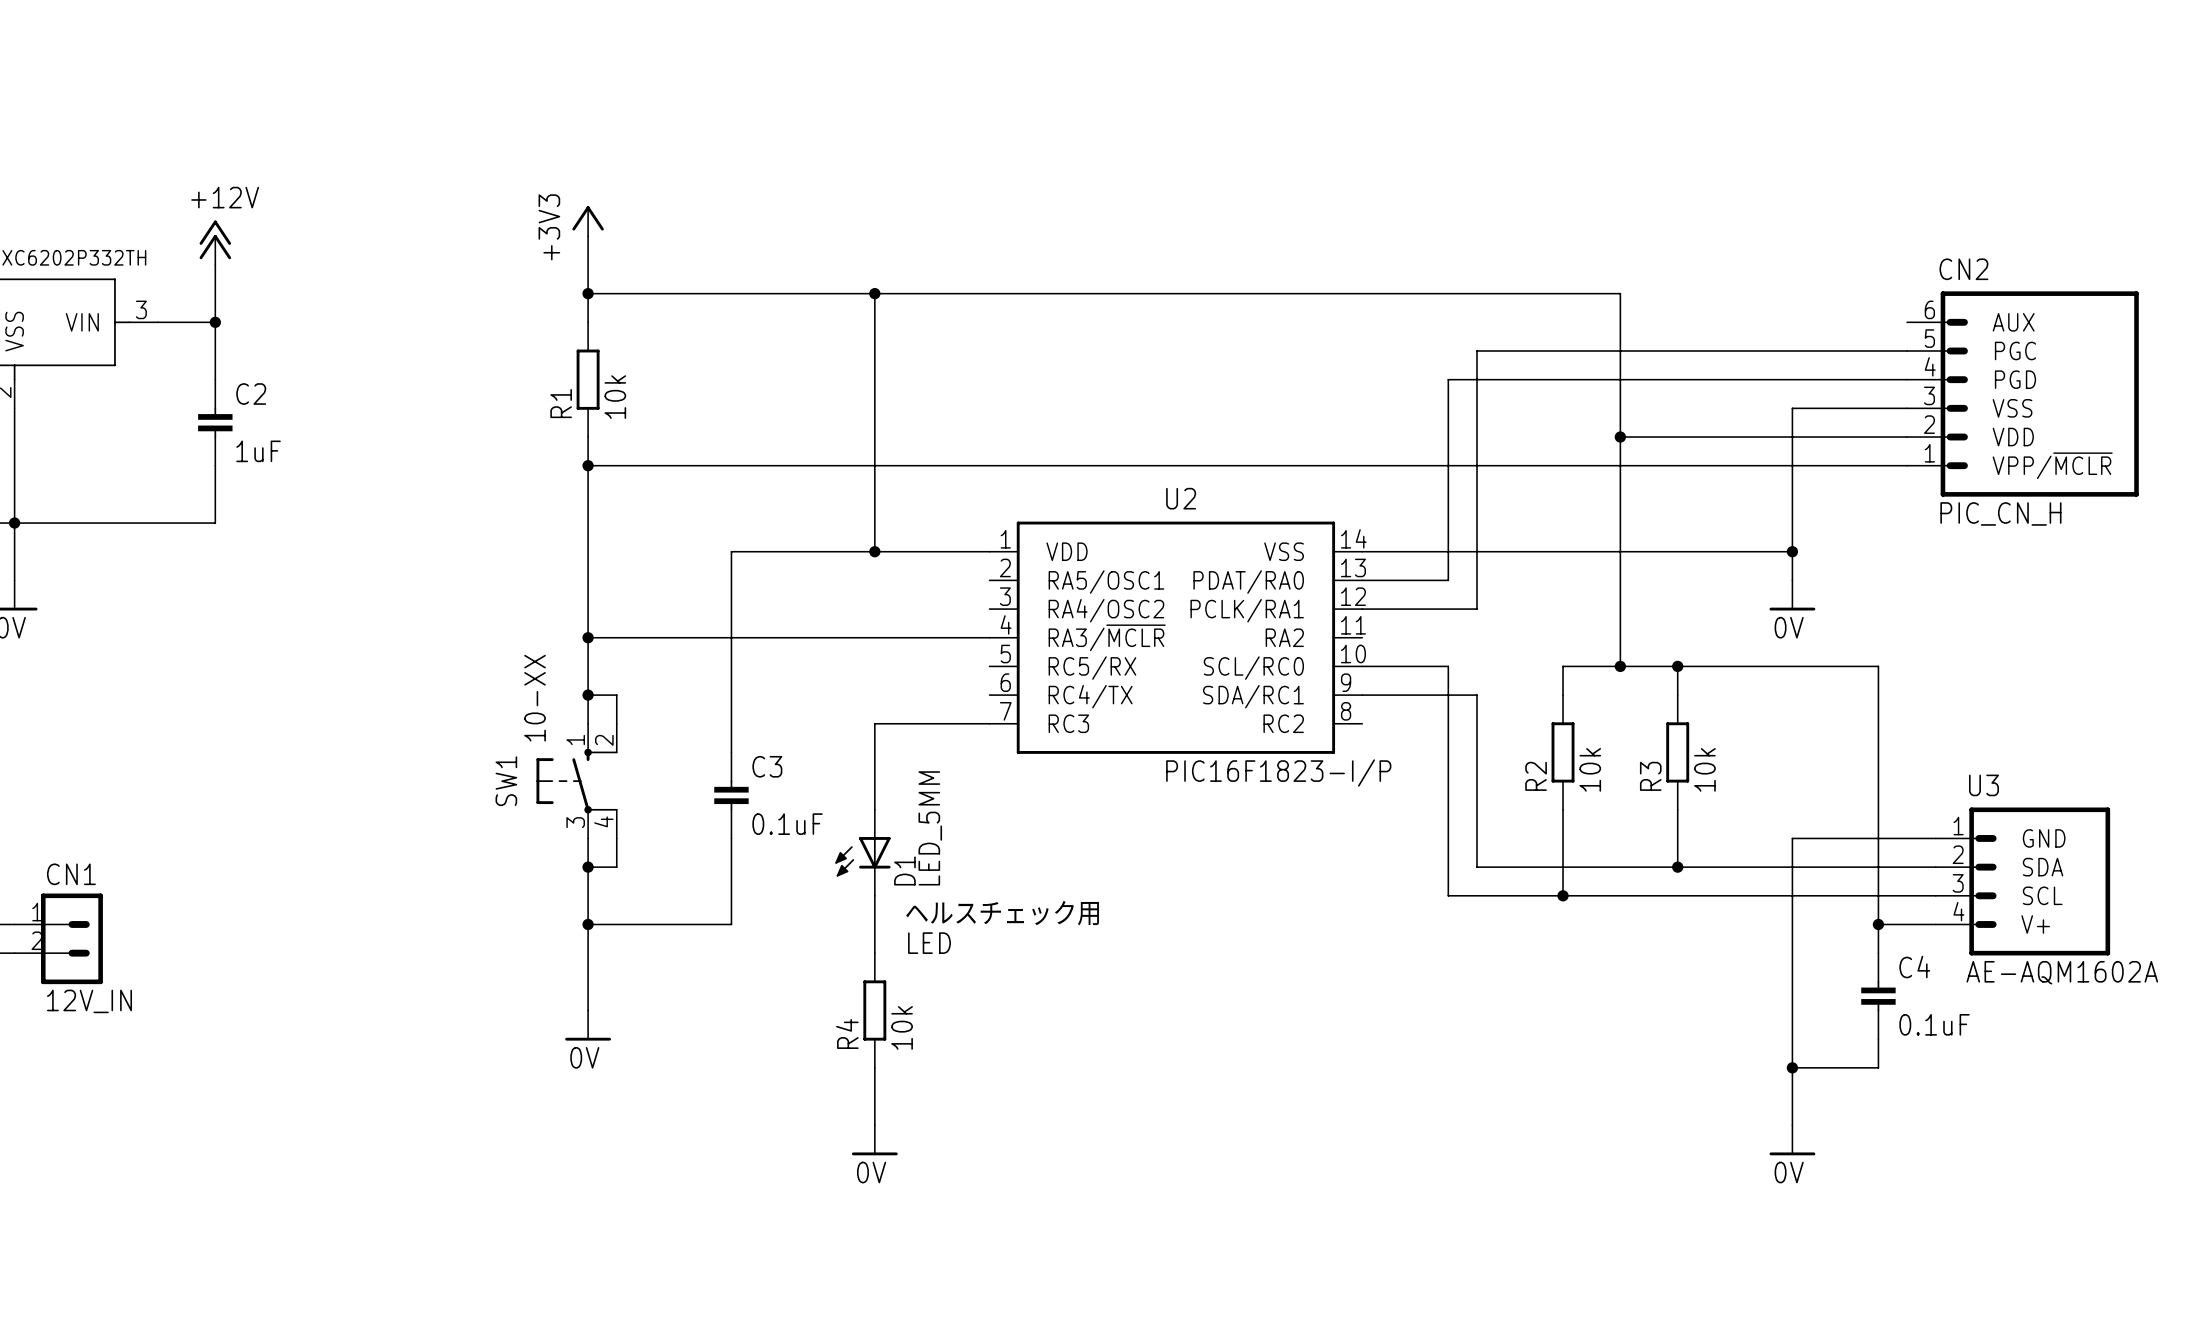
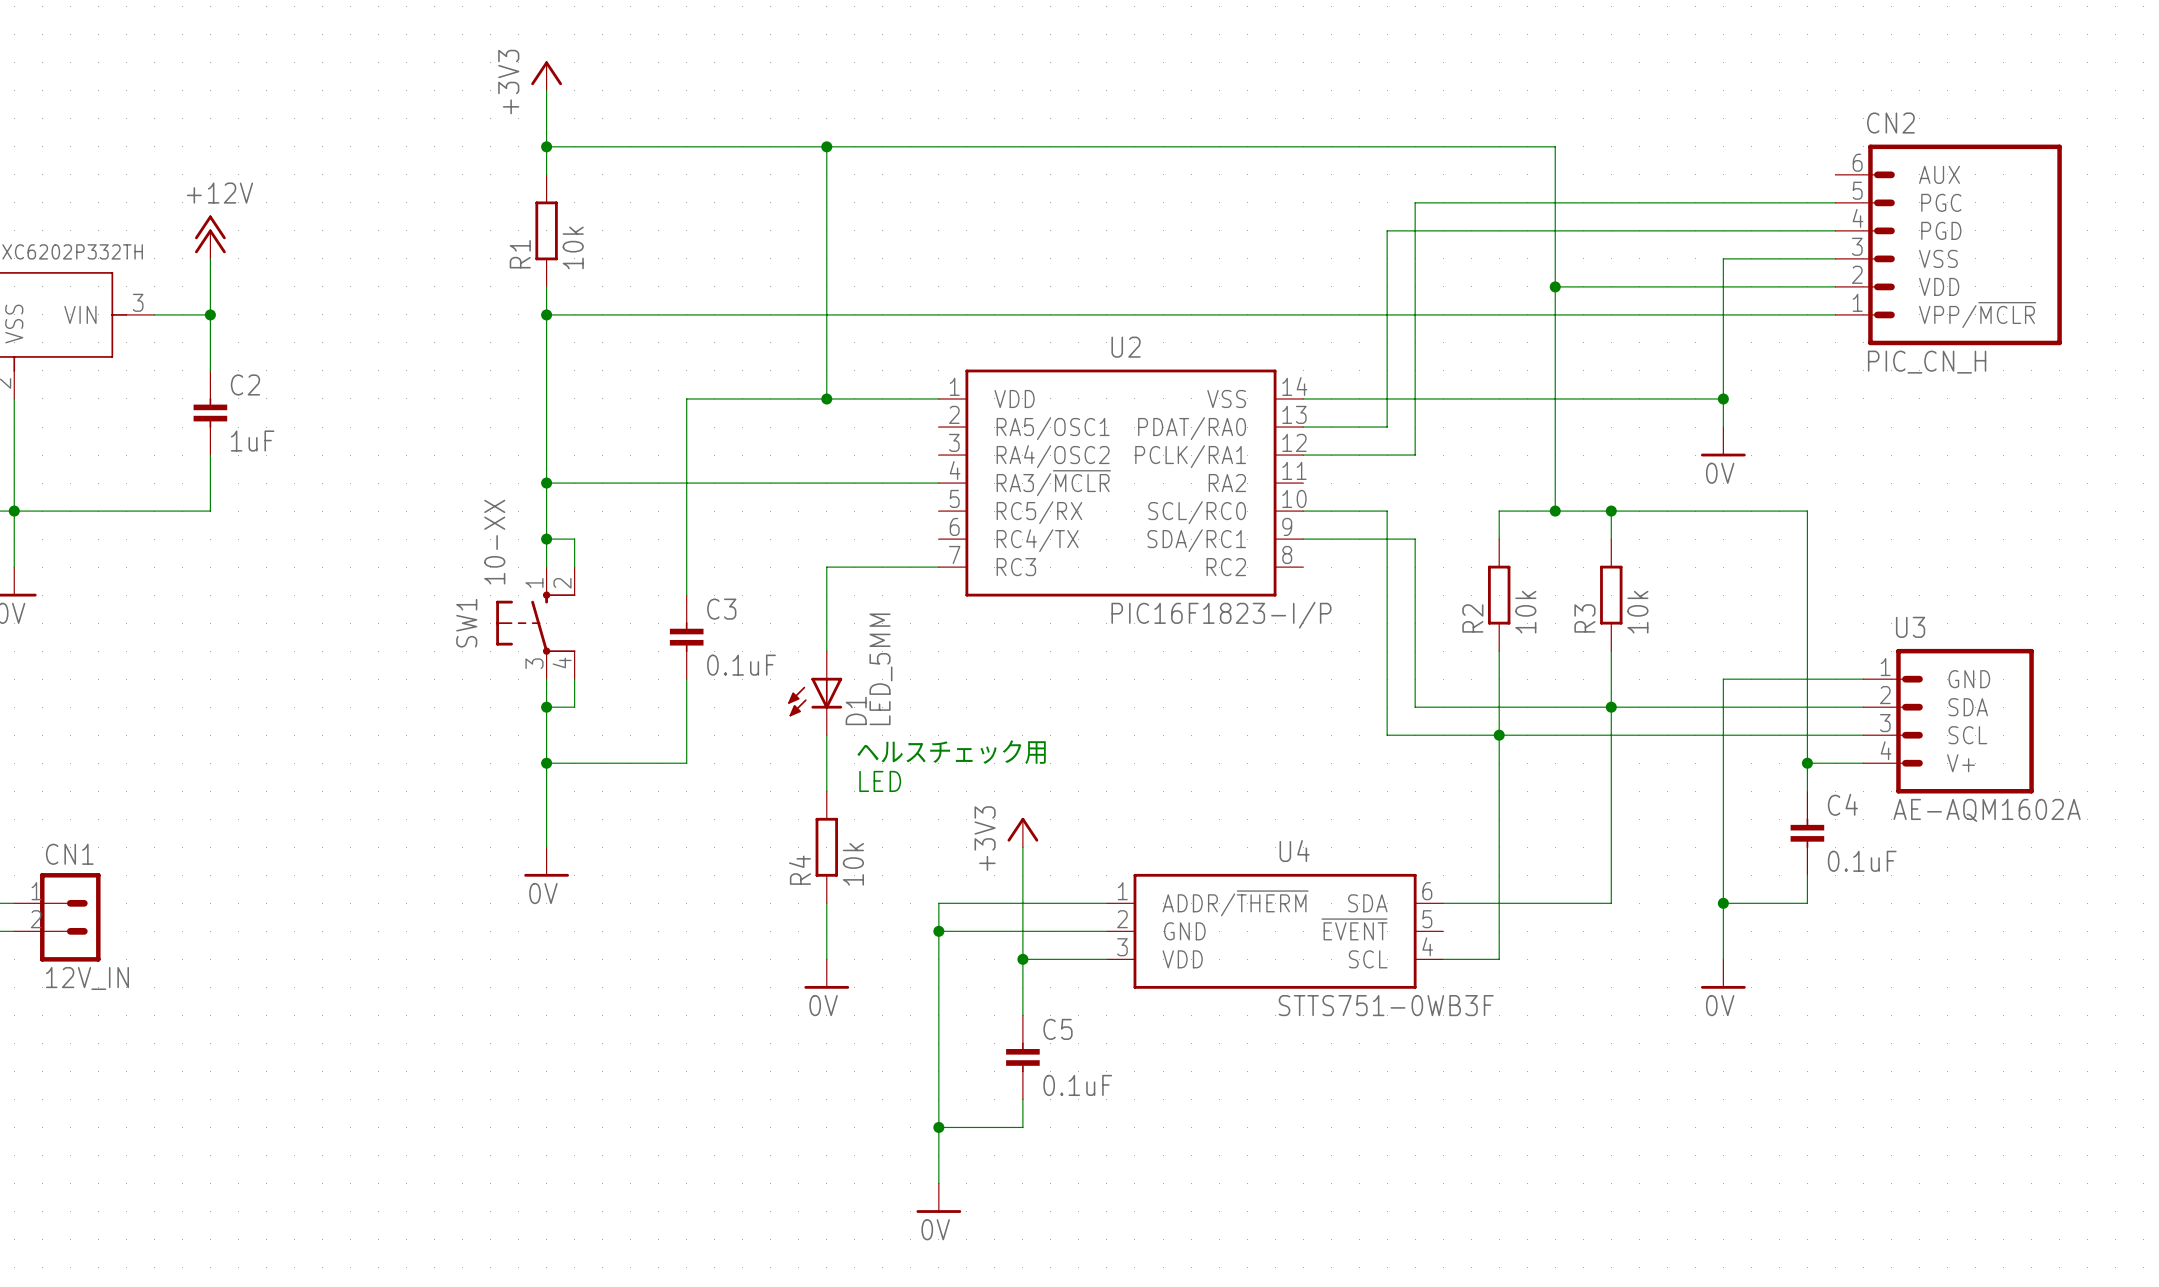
wire: none -> (546, 146) (1555, 146) (1555, 511)
junction: none -> (546, 146)
junction: none -> (826, 146)
power symbol position: +3V3 (588, 221) -> +3V3 (546, 76)
wire: (588, 236) (588, 322) -> (546, 90) (546, 174)
wire: none -> (1835, 230) (1387, 230) (1387, 427) (1303, 427)
wire: none -> (546, 286) (546, 567)
wire: (588, 293) (1591, 293) -> none
junction position: (588, 293) -> (546, 314)
wire: (874, 293) (874, 551) -> (826, 146) (826, 398)
junction: (874, 293) -> none
junction: none -> (1555, 286)
wire: (1620, 293) (1620, 666) -> (1583, 286) (1835, 286)
wire: none -> (546, 314) (1835, 314)
wire: (1907, 350) (1476, 350) (1476, 609) (1362, 609) -> none
R1 position: (588, 379) -> (546, 230)
wire: (1448, 379) (1907, 379) -> (1415, 370) (1415, 202) (1835, 202)
CN2 position: (2022, 394) -> (1948, 244)
junction: none -> (826, 398)
wire: none -> (1303, 398) (1723, 398)
junction: none -> (1723, 398)
wire: (1907, 408) (1792, 408) (1792, 580) -> (1835, 258) (1723, 258) (1723, 427)
wire: (588, 437) (588, 551) -> (546, 539) (574, 539)
wire: (1620, 437) (1907, 437) -> none
junction: (1620, 437) -> none
wire: (588, 465) (1333, 465) -> none
junction position: (588, 465) -> (546, 483)
wire: (1907, 465) (1448, 465) (1448, 551) (1792, 551) -> none
wire: none -> (1303, 511) (1387, 511) (1387, 735) (1863, 735)
junction: none -> (1555, 511)
junction: none -> (1611, 511)
junction: none -> (546, 539)
junction: (874, 551) -> none
wire: (989, 551) (731, 551) (731, 752) -> (938, 398) (686, 398) (686, 595)
junction: (1792, 551) -> none
wire: (588, 580) (588, 695) (616, 695) (616, 723) -> none
wire: (1362, 580) (1448, 580) -> (1415, 651) (1415, 567)
power symbol position: 0V (1792, 595) -> 0V (1723, 441)
wire: (588, 637) (989, 637) -> (546, 483) (938, 483)
junction: (588, 637) -> none
U2 position: (1175, 637) -> (1120, 483)
wire: (1362, 666) (1448, 666) -> none
wire: none -> (1499, 651) (1499, 959) (1443, 959)
junction: (1620, 666) -> none
wire: none -> (1611, 651) (1611, 903) (1443, 903)
wire: (1677, 666) (1677, 695) -> (1611, 511) (1611, 539)
junction: (1677, 666) -> none
junction position: (588, 695) -> (546, 707)
wire: (1362, 695) (1476, 695) (1476, 867) (1935, 867) -> none
wire: (1563, 695) (1563, 666) (1878, 666) (1878, 953) -> (1499, 539) (1499, 511) (1807, 511) (1807, 791)
wire: none -> (546, 707) (574, 707)
wire: (989, 723) (874, 723) (874, 809) -> (938, 567) (826, 567) (826, 651)
wire: (1448, 723) (1448, 895) (1935, 895) -> (1415, 707) (1863, 707)
junction: none -> (1611, 707)
junction: none -> (1499, 735)
R2 position: (1563, 752) -> (1499, 595)
R3 position: (1677, 752) -> (1611, 595)
junction: none -> (546, 763)
SW1 position: (577, 781) -> (535, 623)
junction: none -> (1807, 763)
C3 position: (731, 795) -> (686, 637)
wire: (1563, 809) (1563, 895) -> none
wire: (1677, 809) (1677, 867) -> none
wire: (588, 838) (588, 1010) -> (546, 679) (546, 847)
wire: (616, 838) (616, 867) (588, 867) -> none
wire: (731, 838) (731, 924) (588, 924) -> (686, 679) (686, 763) (546, 763)
wire: (1935, 838) (1792, 838) (1792, 1125) -> (1863, 679) (1723, 679) (1723, 959)
D1 position: (862, 852) -> (815, 693)
power symbol: none -> +3V3 (1022, 832)
junction: (588, 867) -> none
wire: none -> (1022, 847) (1022, 1015)
junction: (1677, 867) -> none
U3 position: (2022, 881) -> (1948, 721)
power symbol: none -> 0V (546, 861)
wire: (874, 895) (874, 953) -> (826, 735) (826, 791)
junction: (1563, 895) -> none
text position: ヘルスチェック用 (1002, 913) -> ヘルスチェック用 (951, 752)
junction: (588, 924) -> none
wire: none -> (1106, 903) (938, 903) (938, 1183)
junction: none -> (1723, 903)
wire: (1878, 924) (1935, 924) -> (1807, 763) (1863, 763)
junction: (1878, 924) -> none
text position: LED (929, 943) -> LED (880, 781)
wire: none -> (938, 931) (1106, 931)
junction: none -> (938, 931)
U4: none -> STTS751-0WB3F (1275, 931)
wire: none -> (1022, 959) (1106, 959)
junction: none -> (1022, 959)
power symbol: none -> 0V (826, 974)
C4 position: (1878, 996) -> (1807, 833)
R4 position: (874, 1010) -> (826, 847)
power symbol: 0V (588, 1025) -> none
wire: (1878, 1039) (1878, 1067) (1792, 1067) -> (1807, 875) (1807, 903) (1723, 903)
wire: (874, 1067) (874, 1125) -> (826, 903) (826, 959)
junction: (1792, 1067) -> none
C5: none -> 0.1uF (1022, 1057)
wire: none -> (1022, 1099) (1022, 1127) (938, 1127)
power symbol: 0V (874, 1140) -> none
power symbol position: 0V (1792, 1140) -> 0V (1723, 974)
junction: none -> (938, 1127)
power symbol: none -> 0V (938, 1198)

